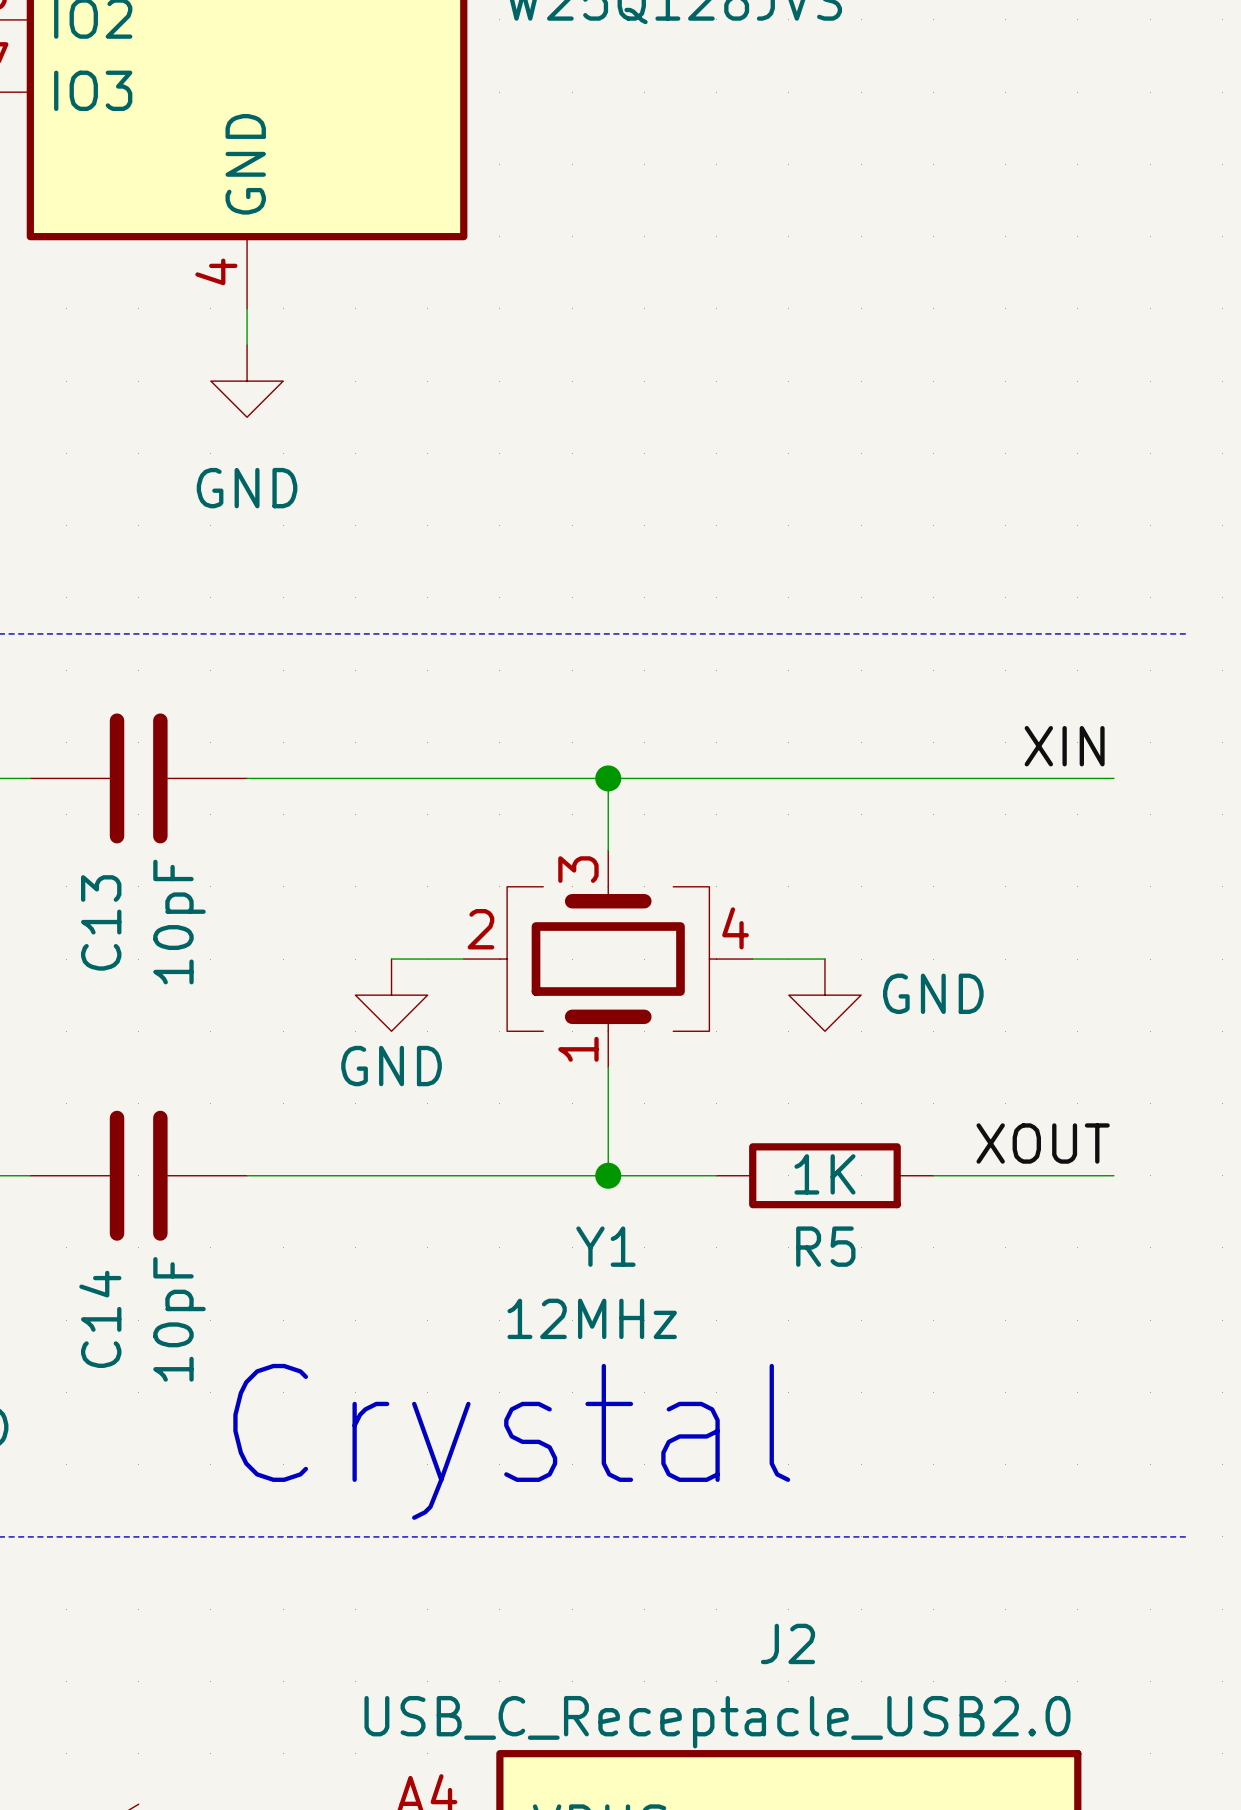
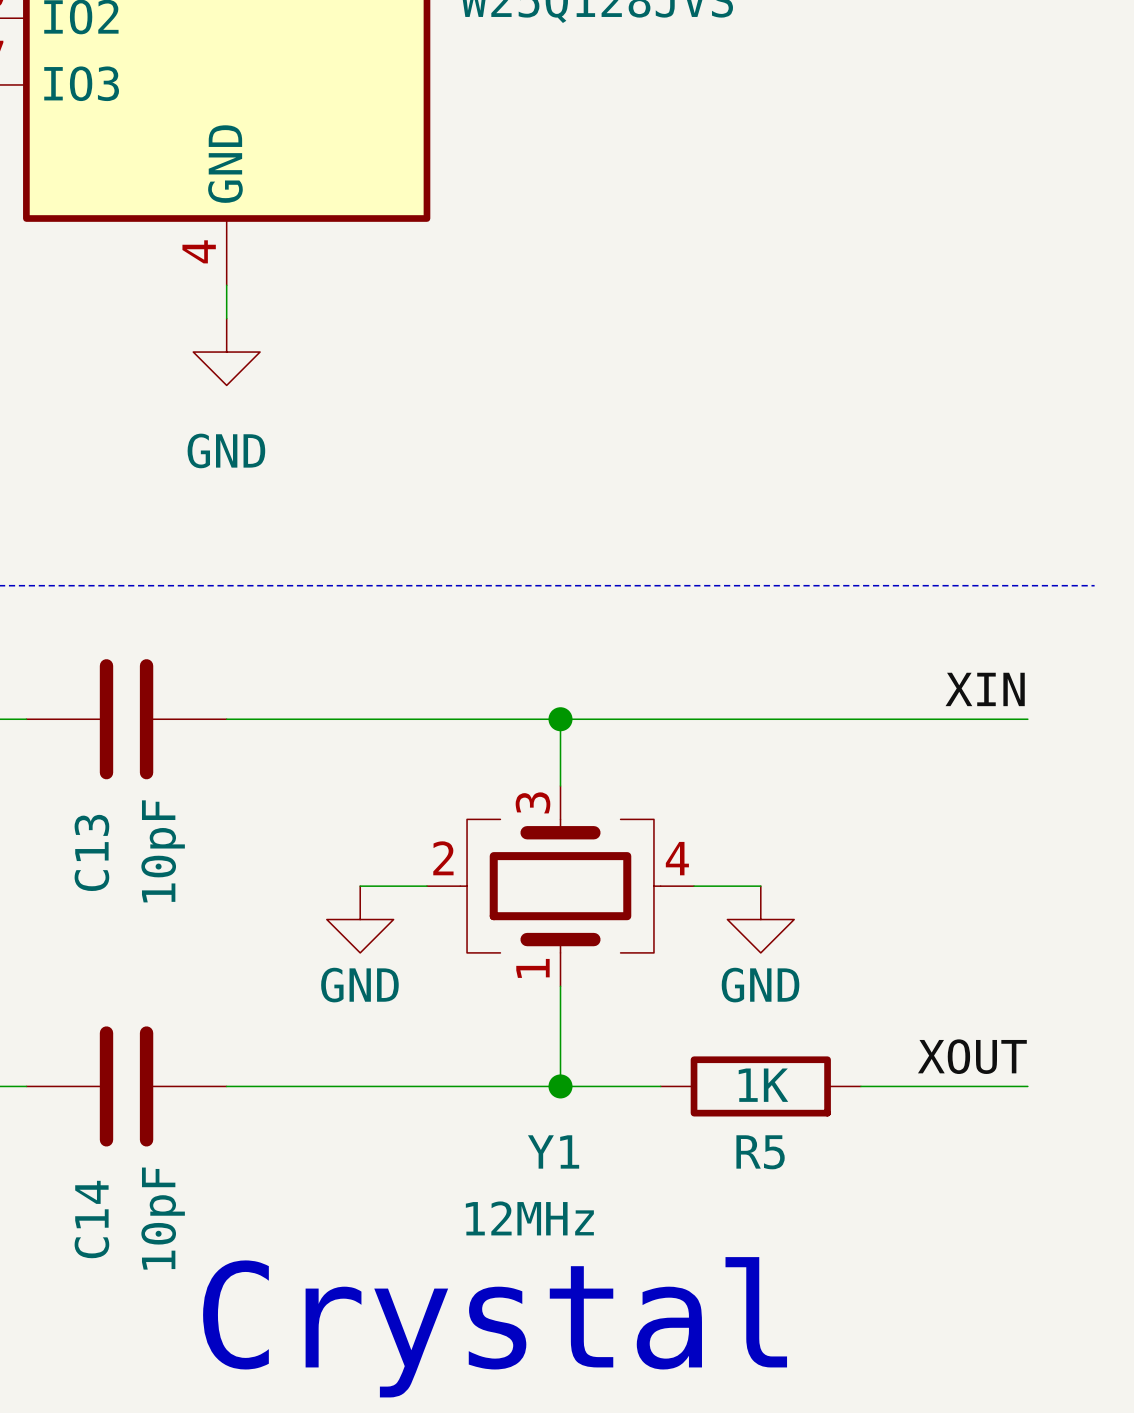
power symbol text position: GND (933, 993) -> GND (760, 985)

